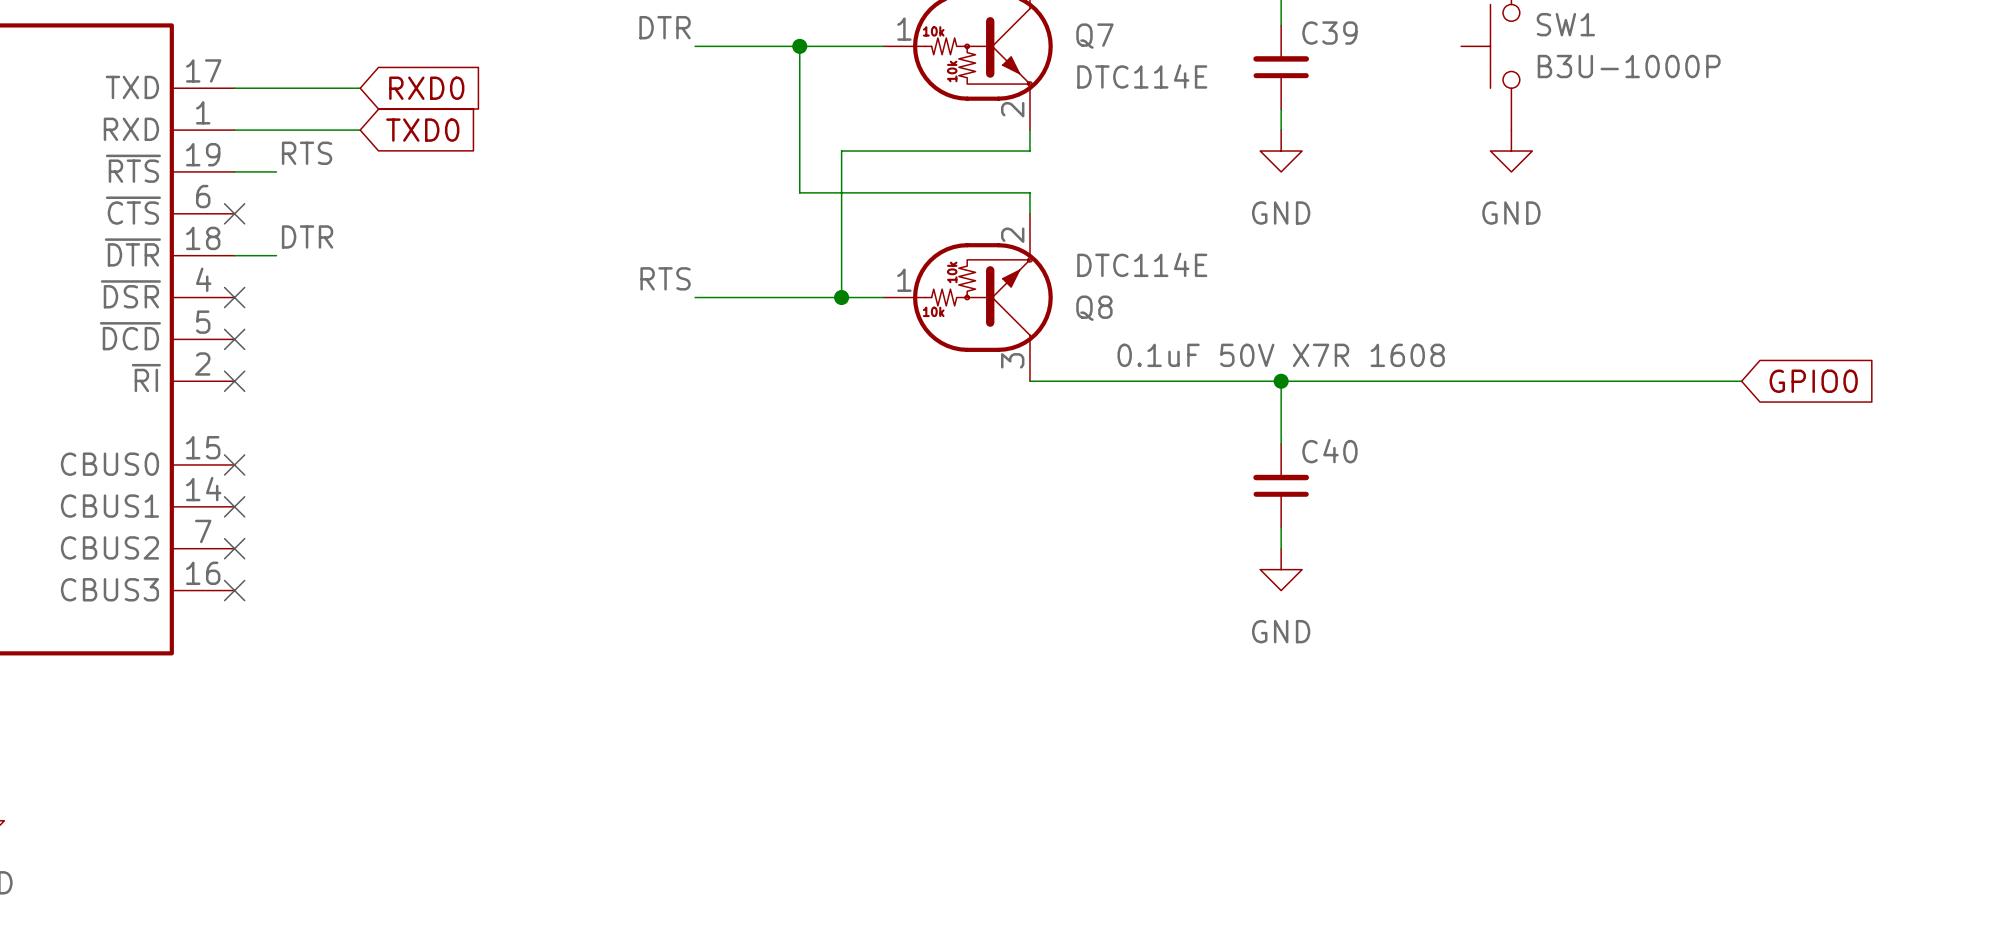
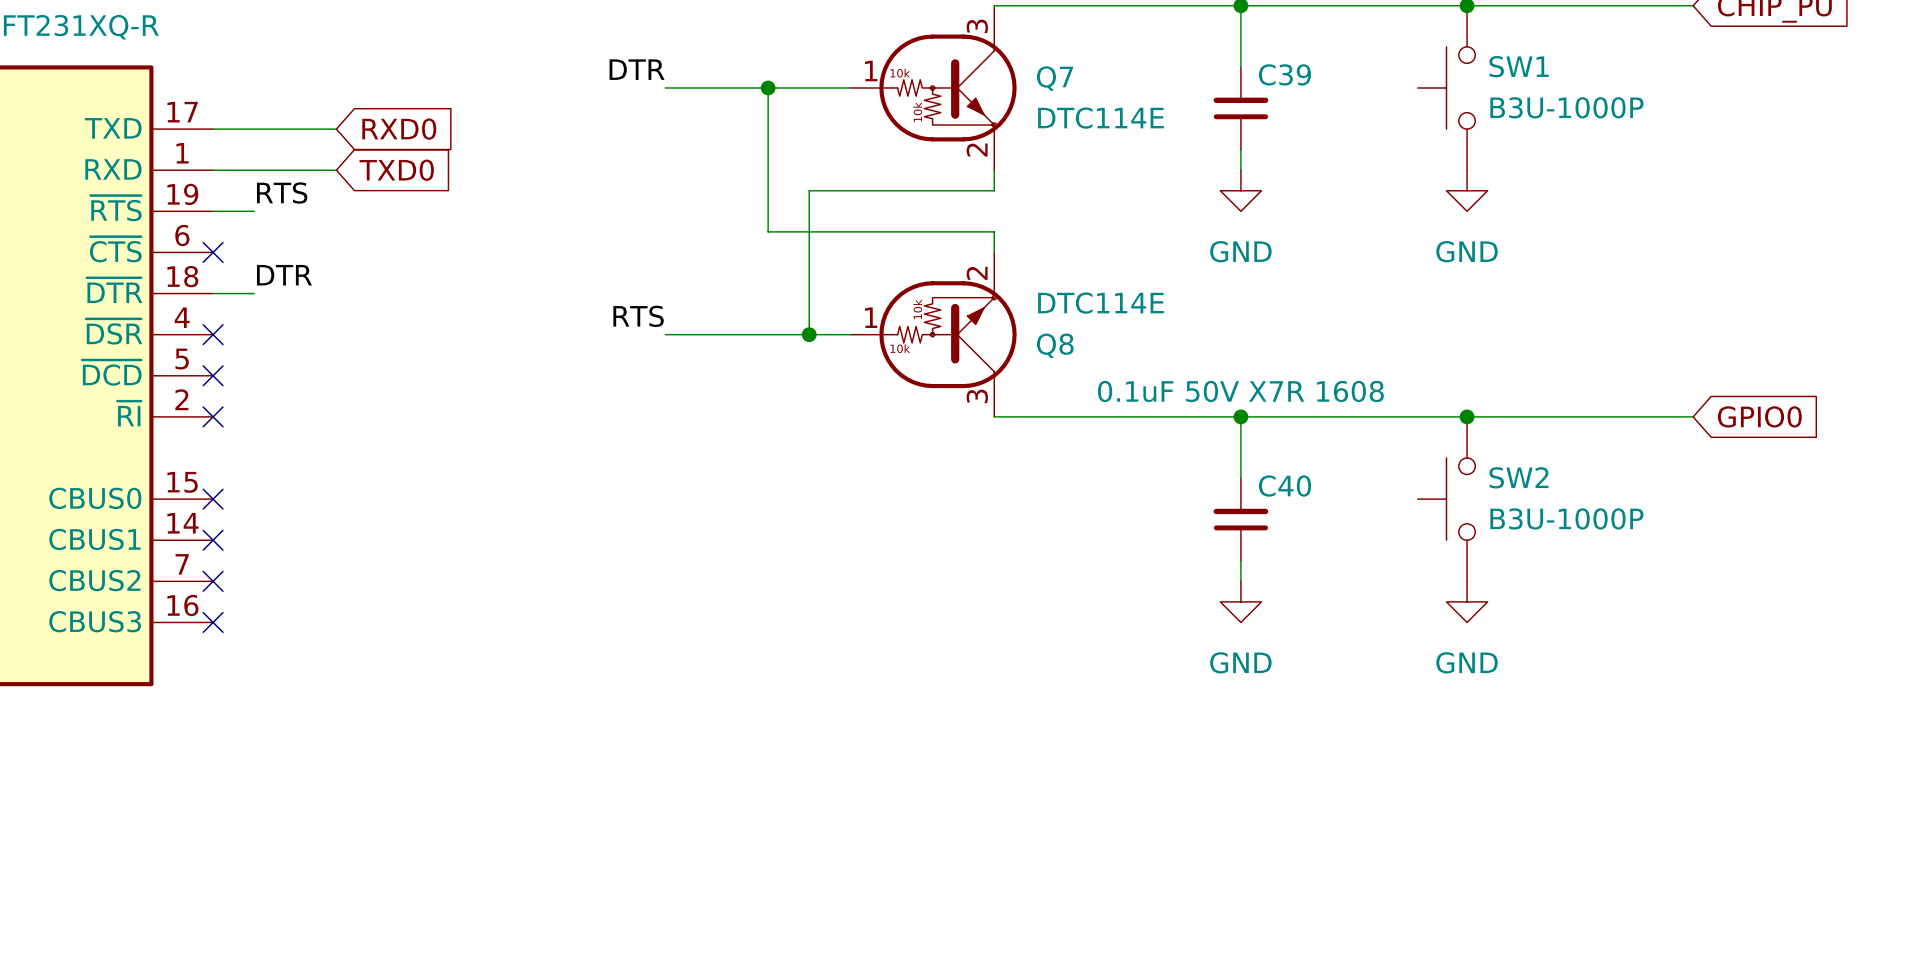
junction: none -> (1467, 416)
SW2: none -> B3U-1000P (1446, 499)
power symbol: none -> GND (1467, 601)

